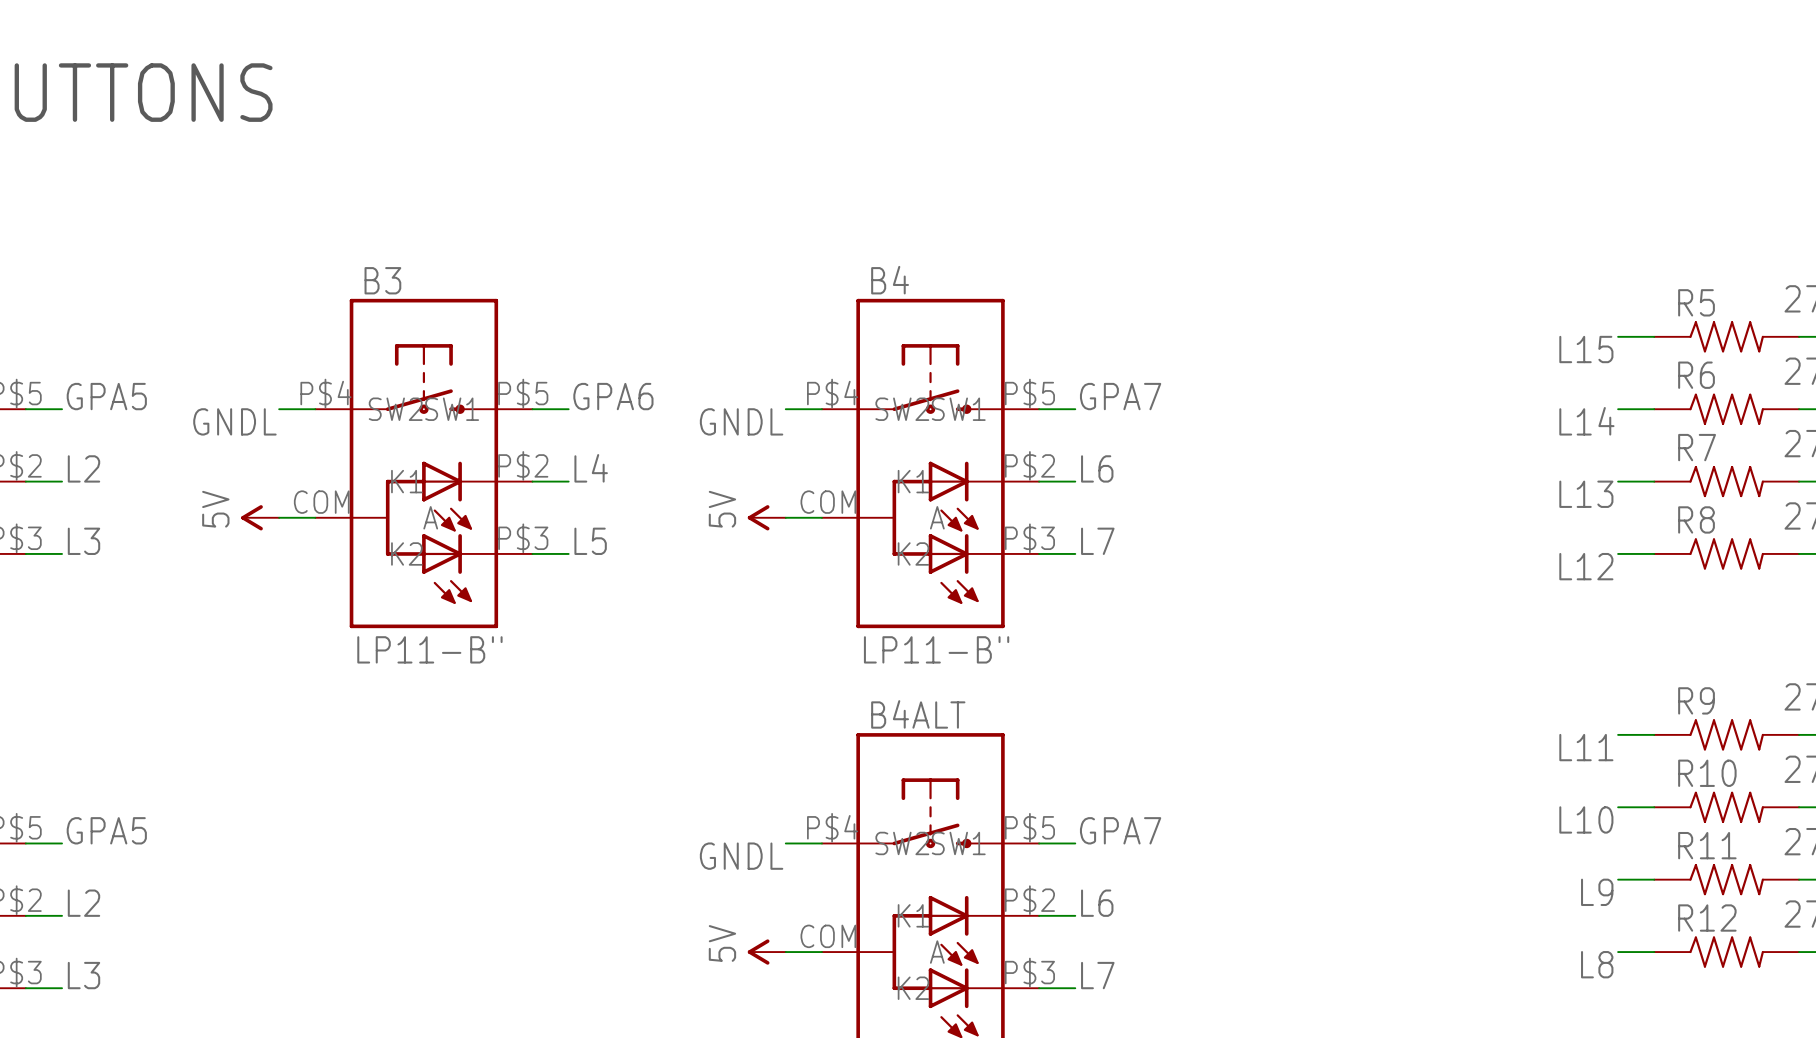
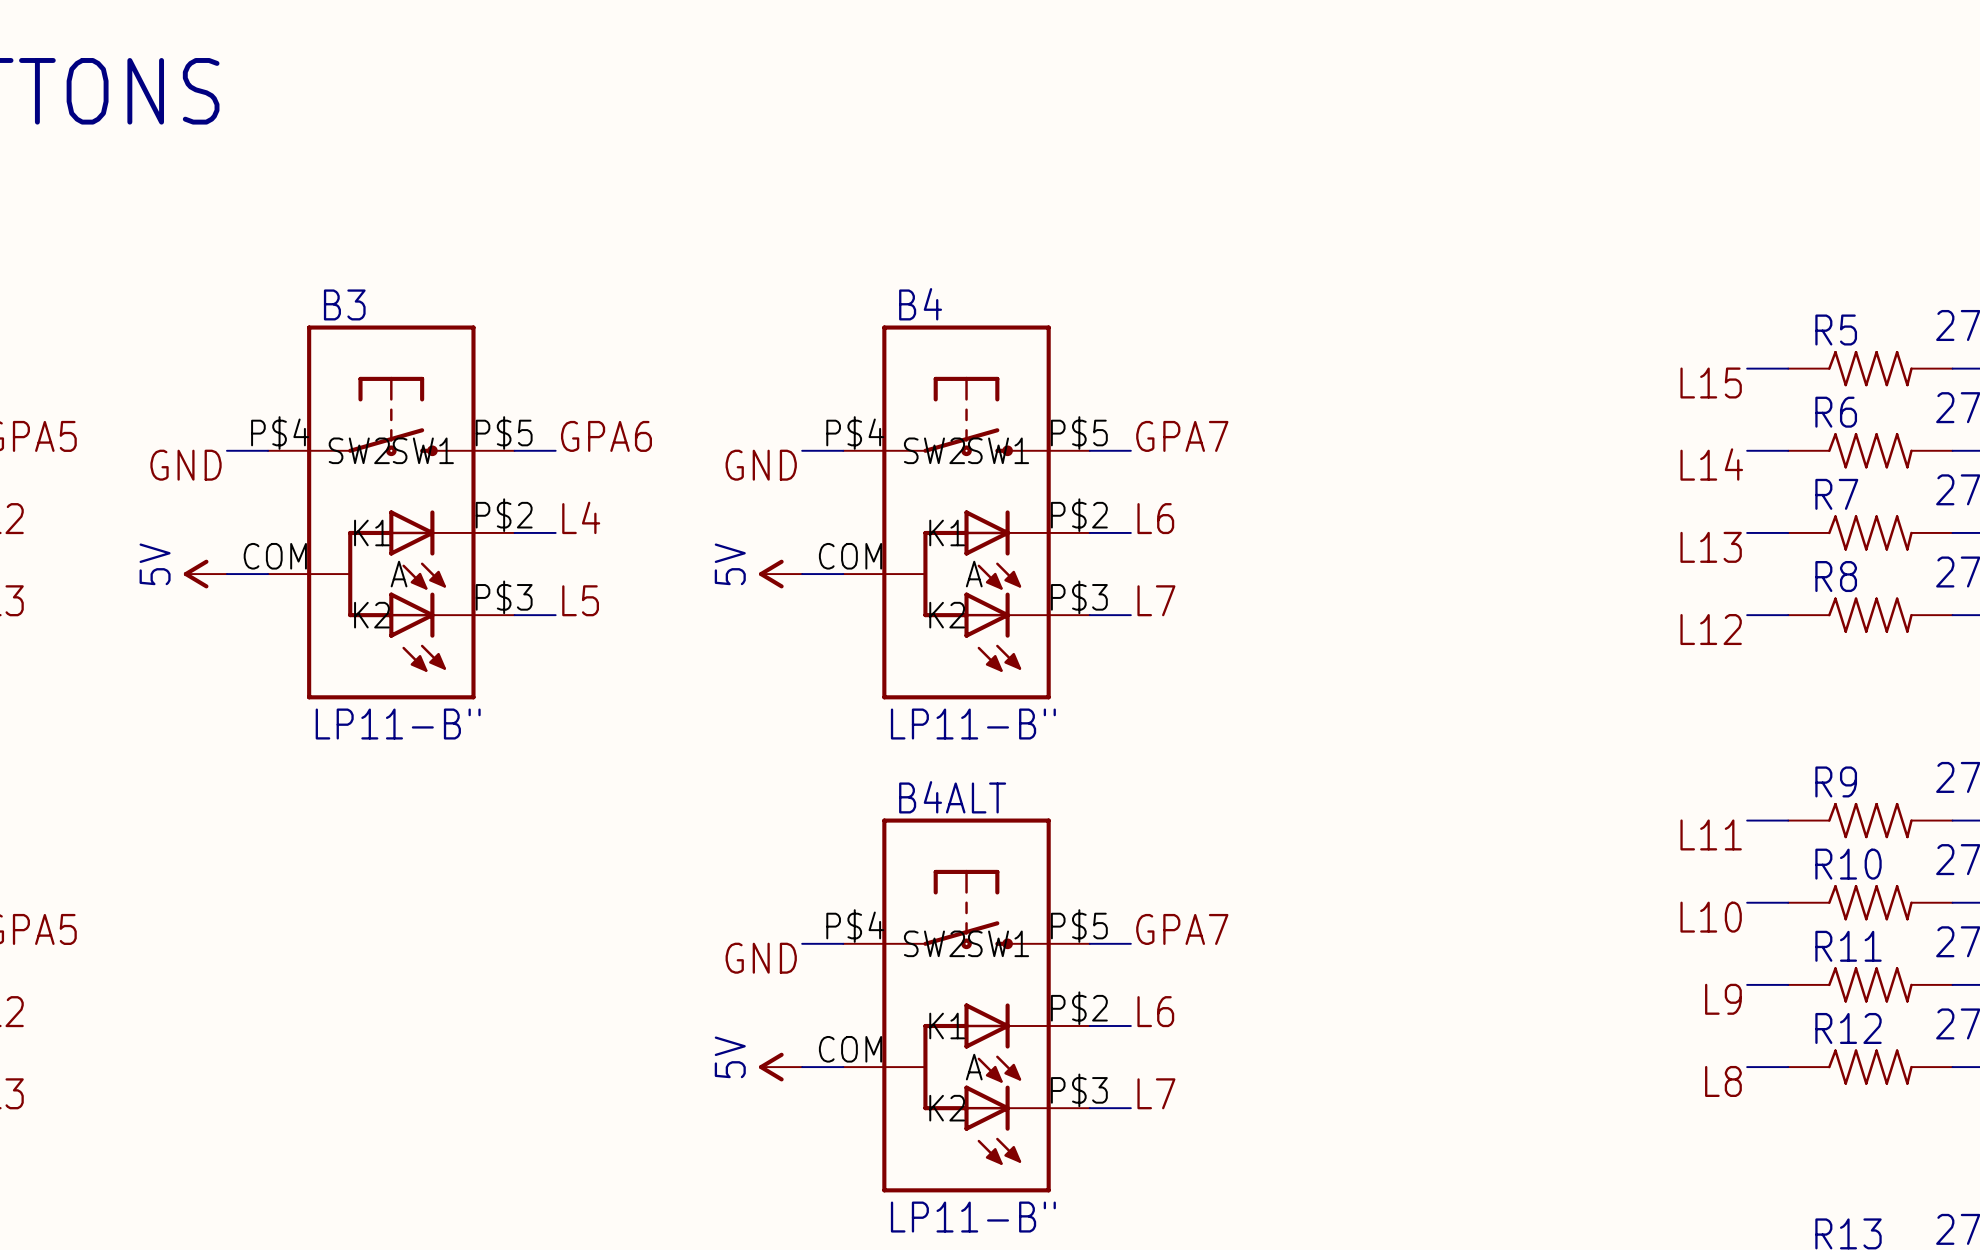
label: GNDL (234, 421) -> GND (186, 465)
label: GNDL (741, 421) -> GND (761, 465)
label: GNDL (741, 856) -> GND (761, 958)

